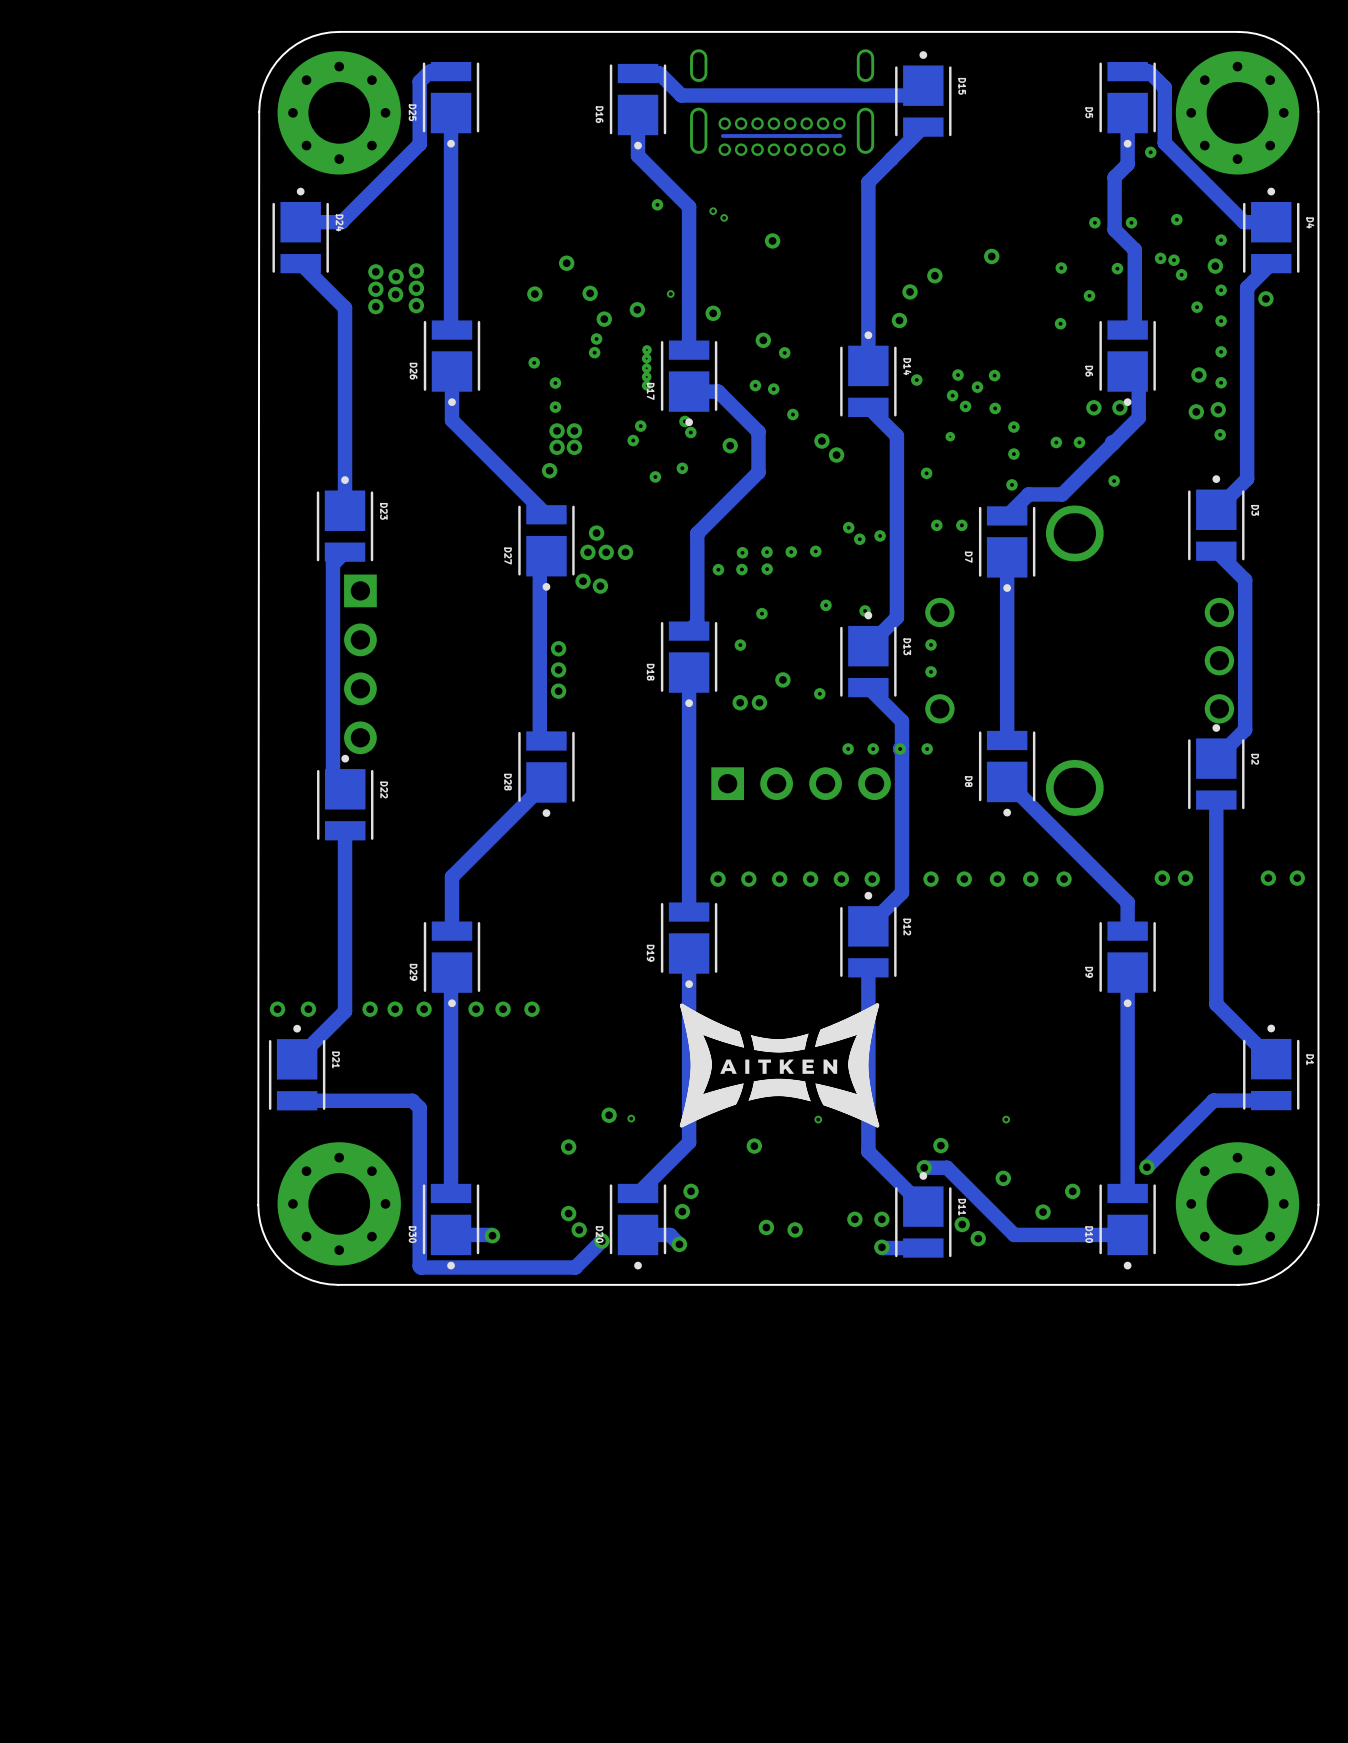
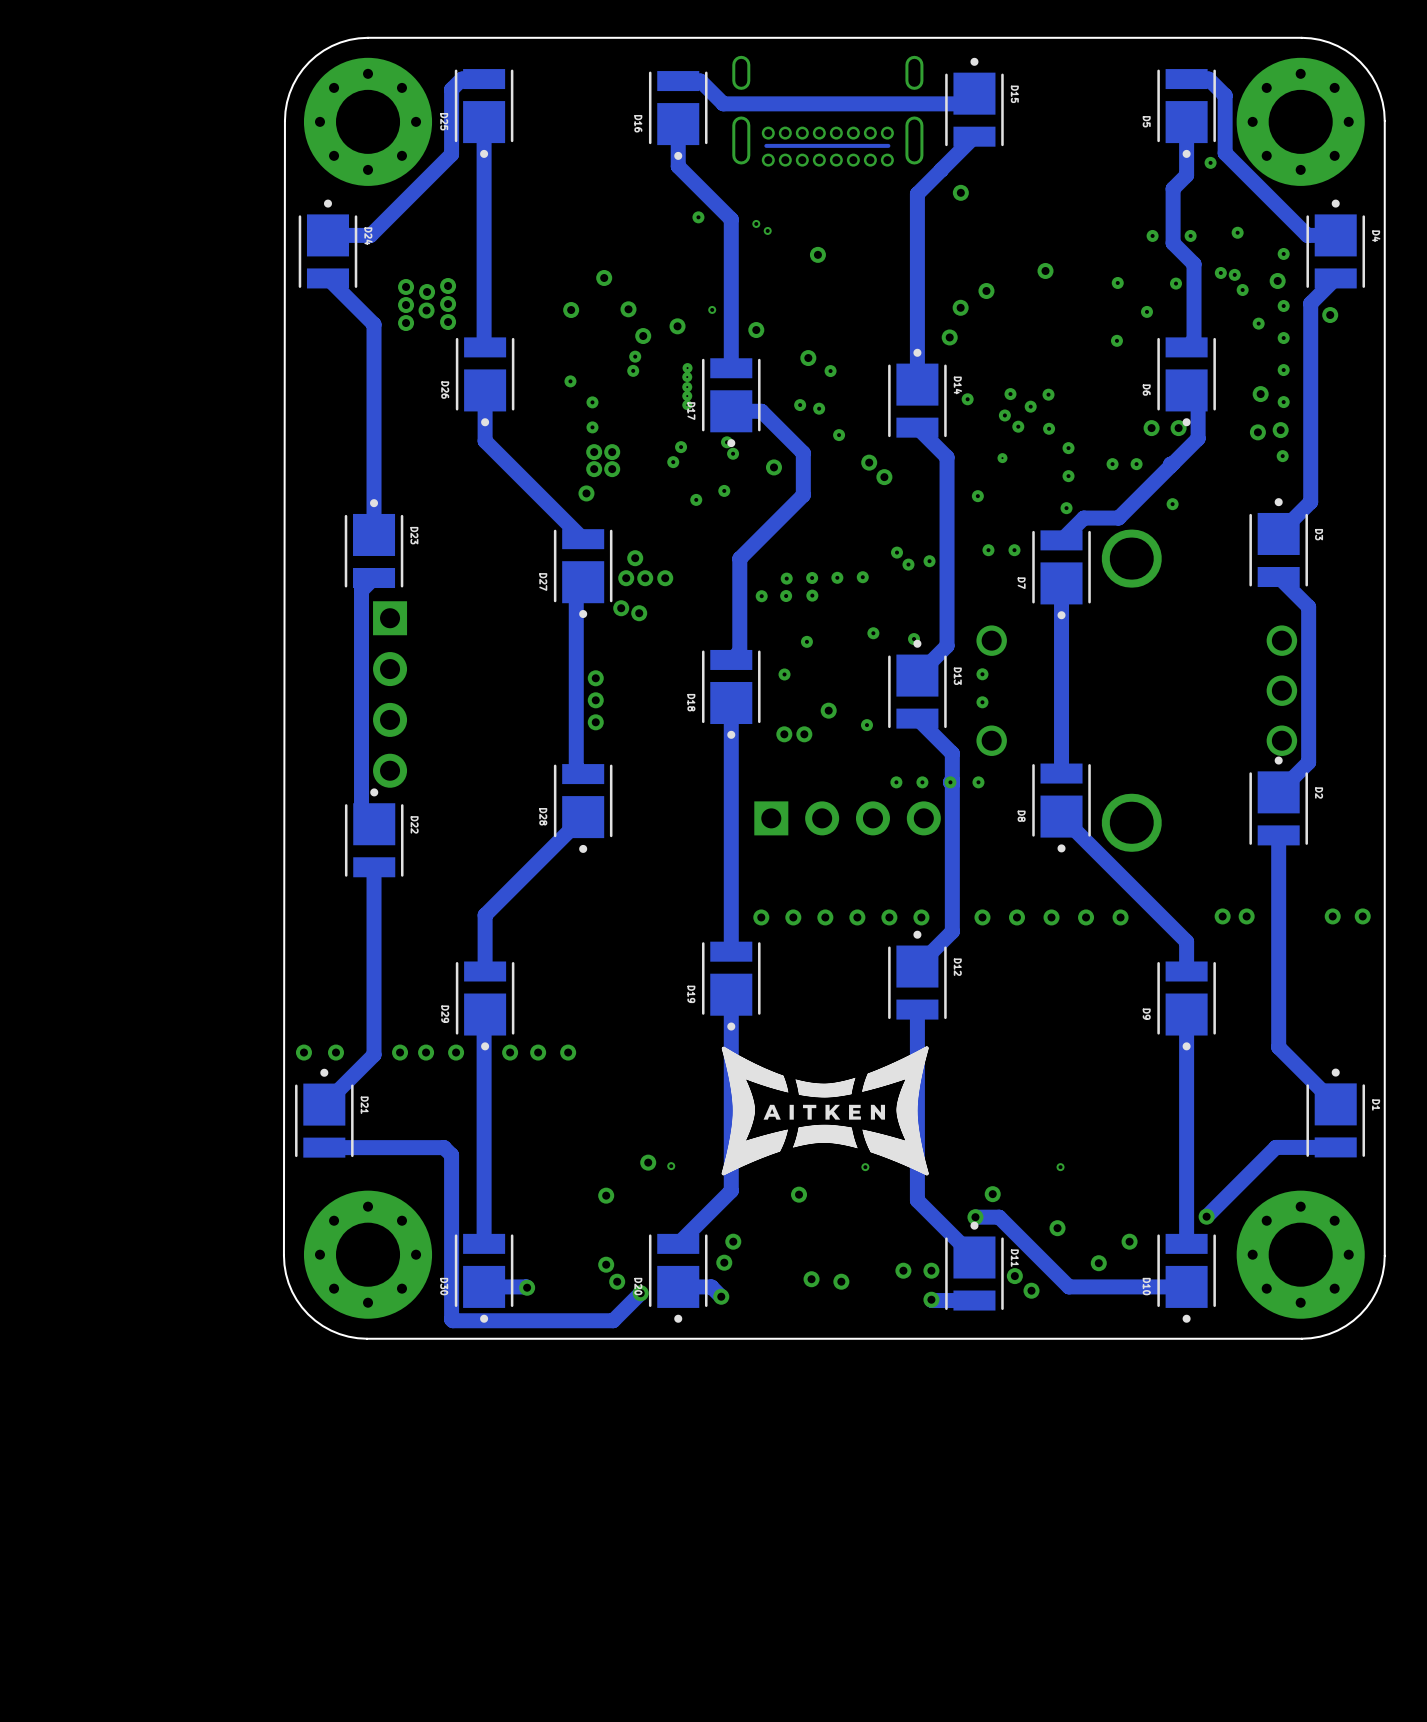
via: none -> (960, 192)

